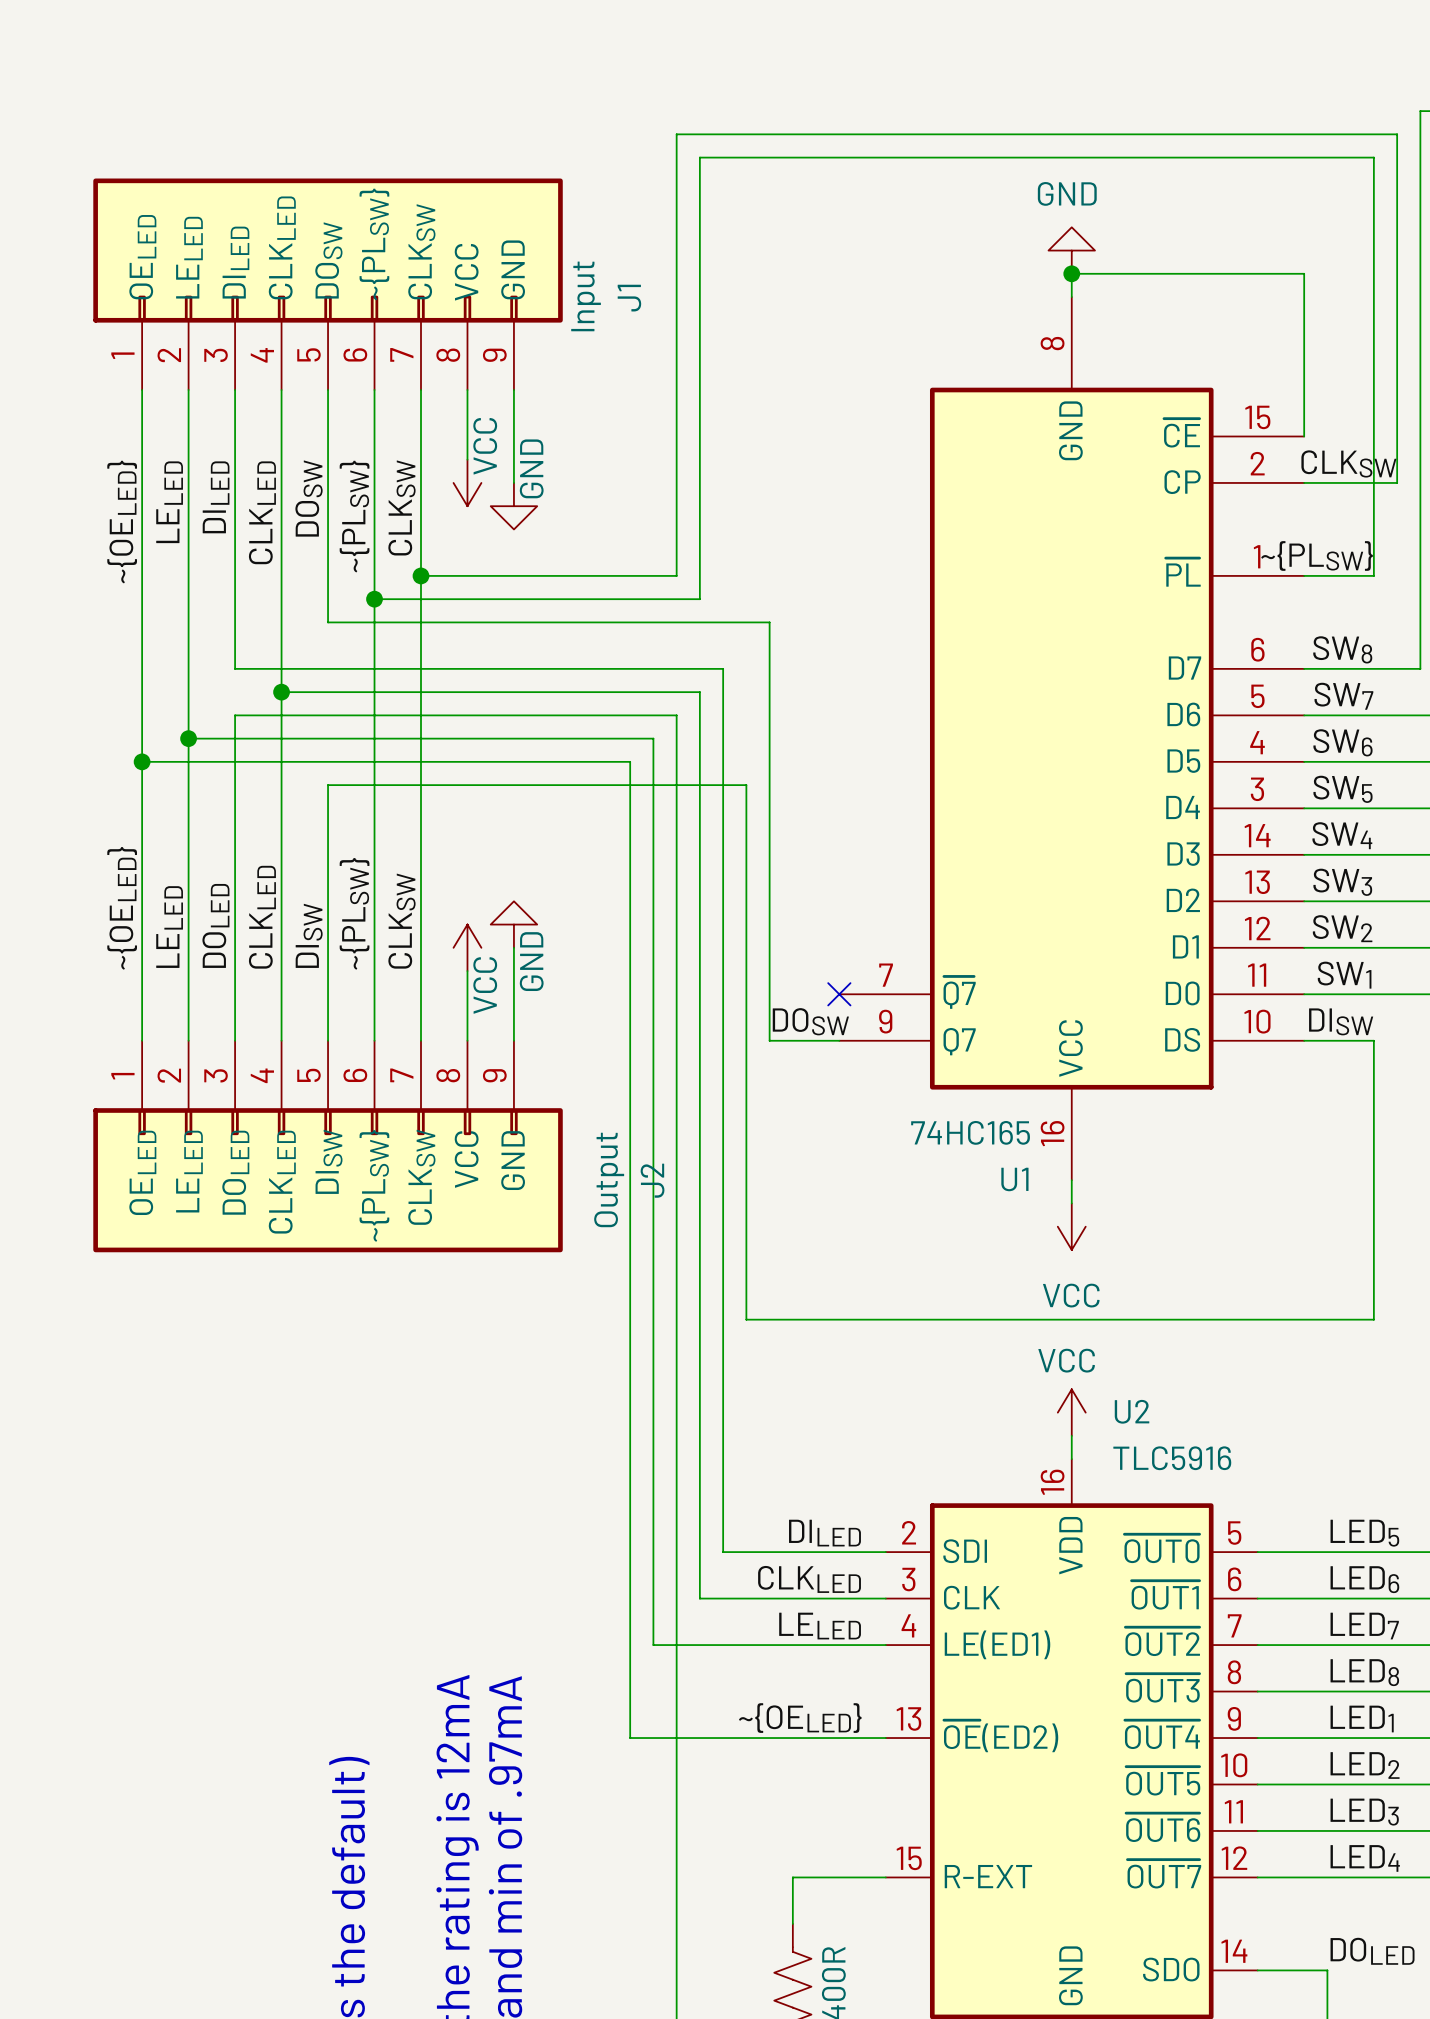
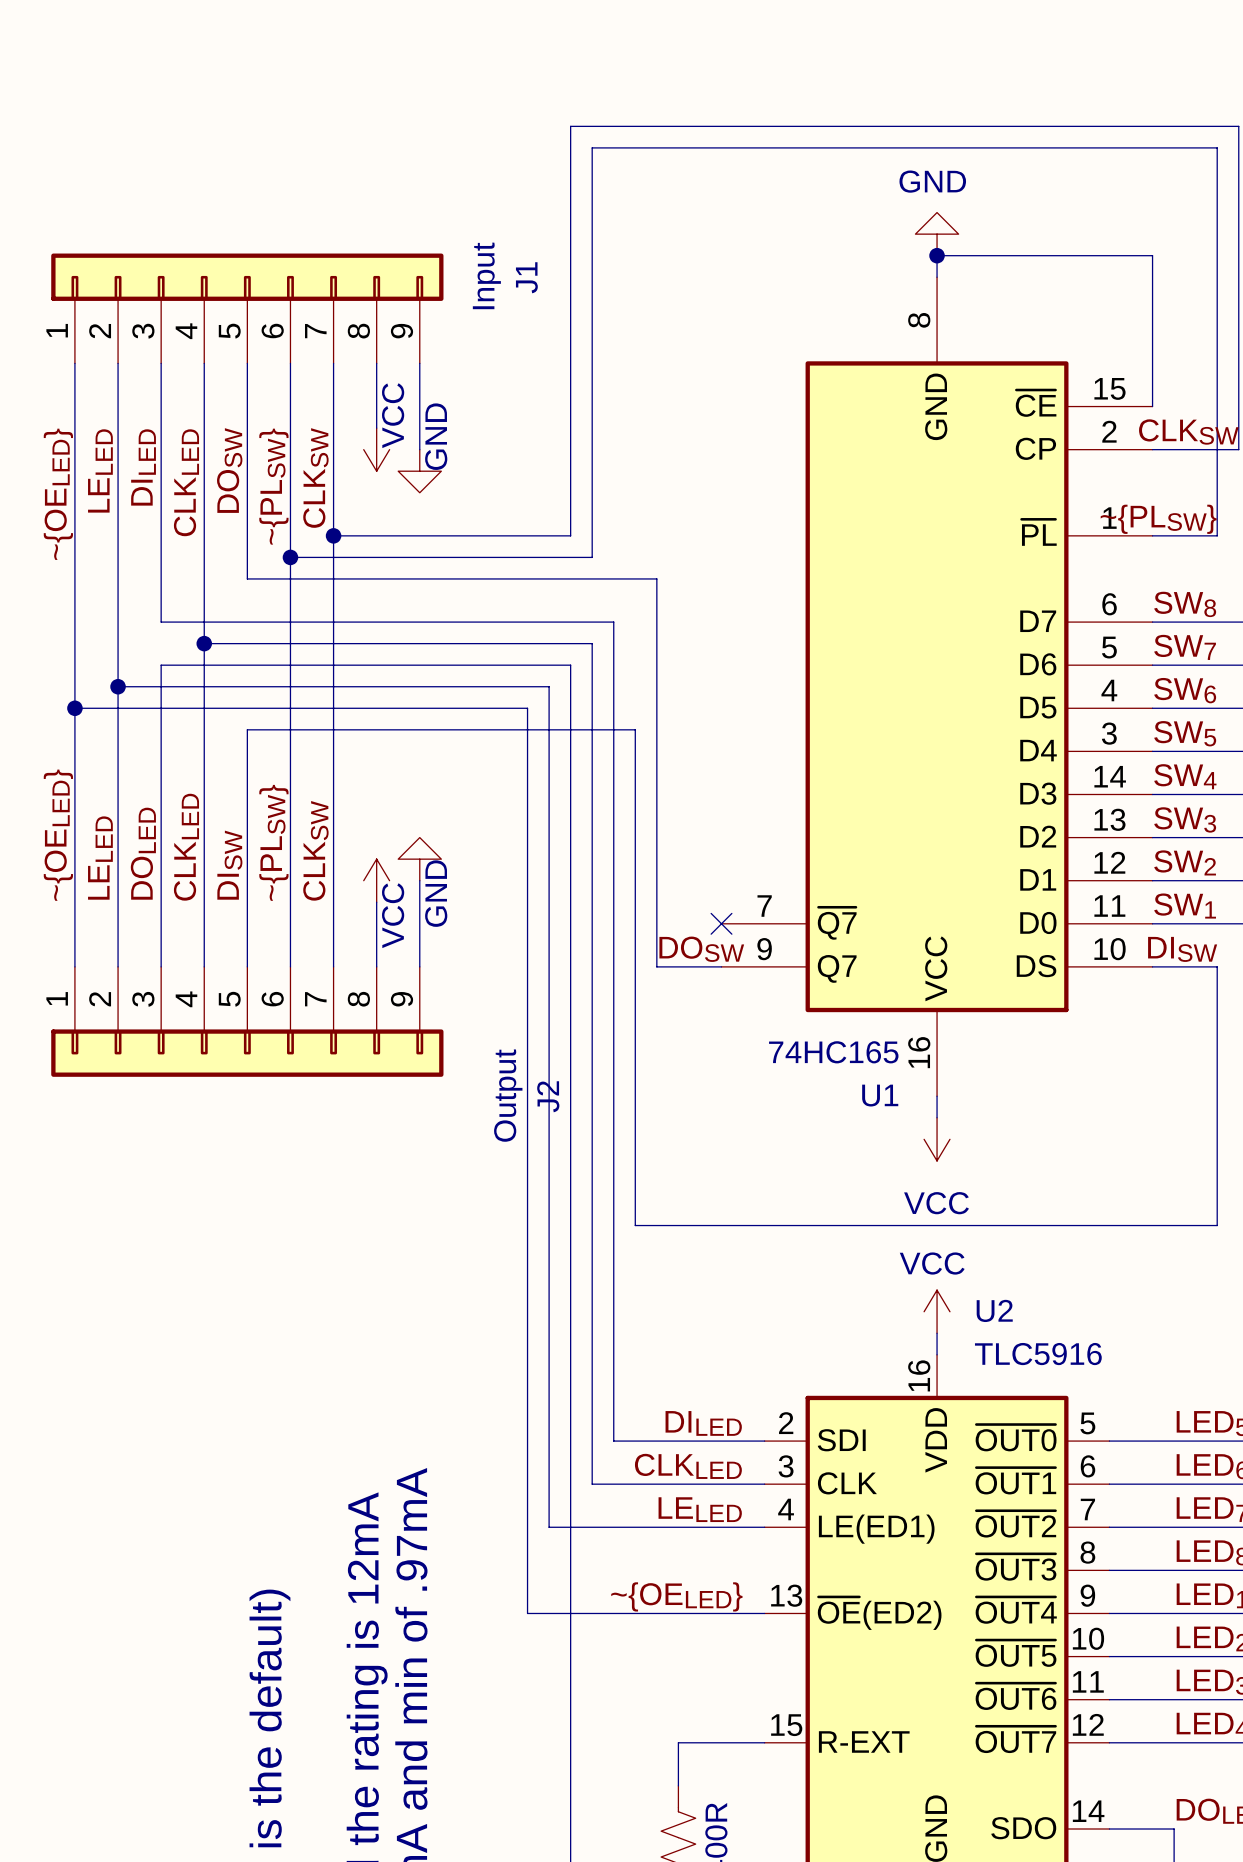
J1 symbol: [93, 178, 563, 391] -> [51, 253, 444, 364]
J2 symbol: [93, 1040, 563, 1253] -> [51, 966, 444, 1077]

